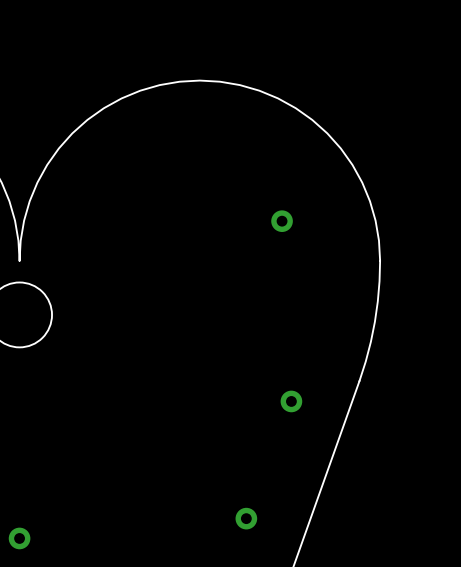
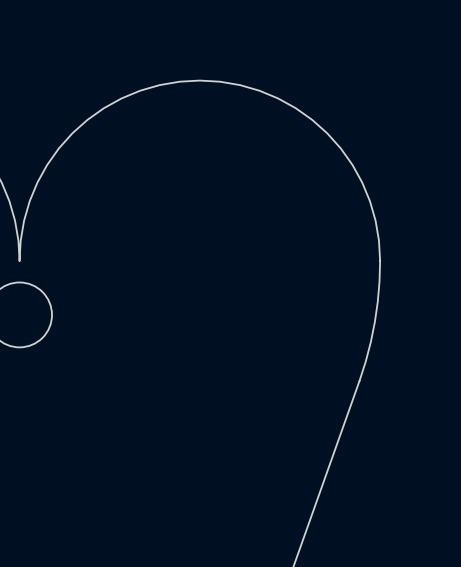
via: (282, 221) -> none
via: (291, 401) -> none
via: (246, 518) -> none
via: (19, 538) -> none

